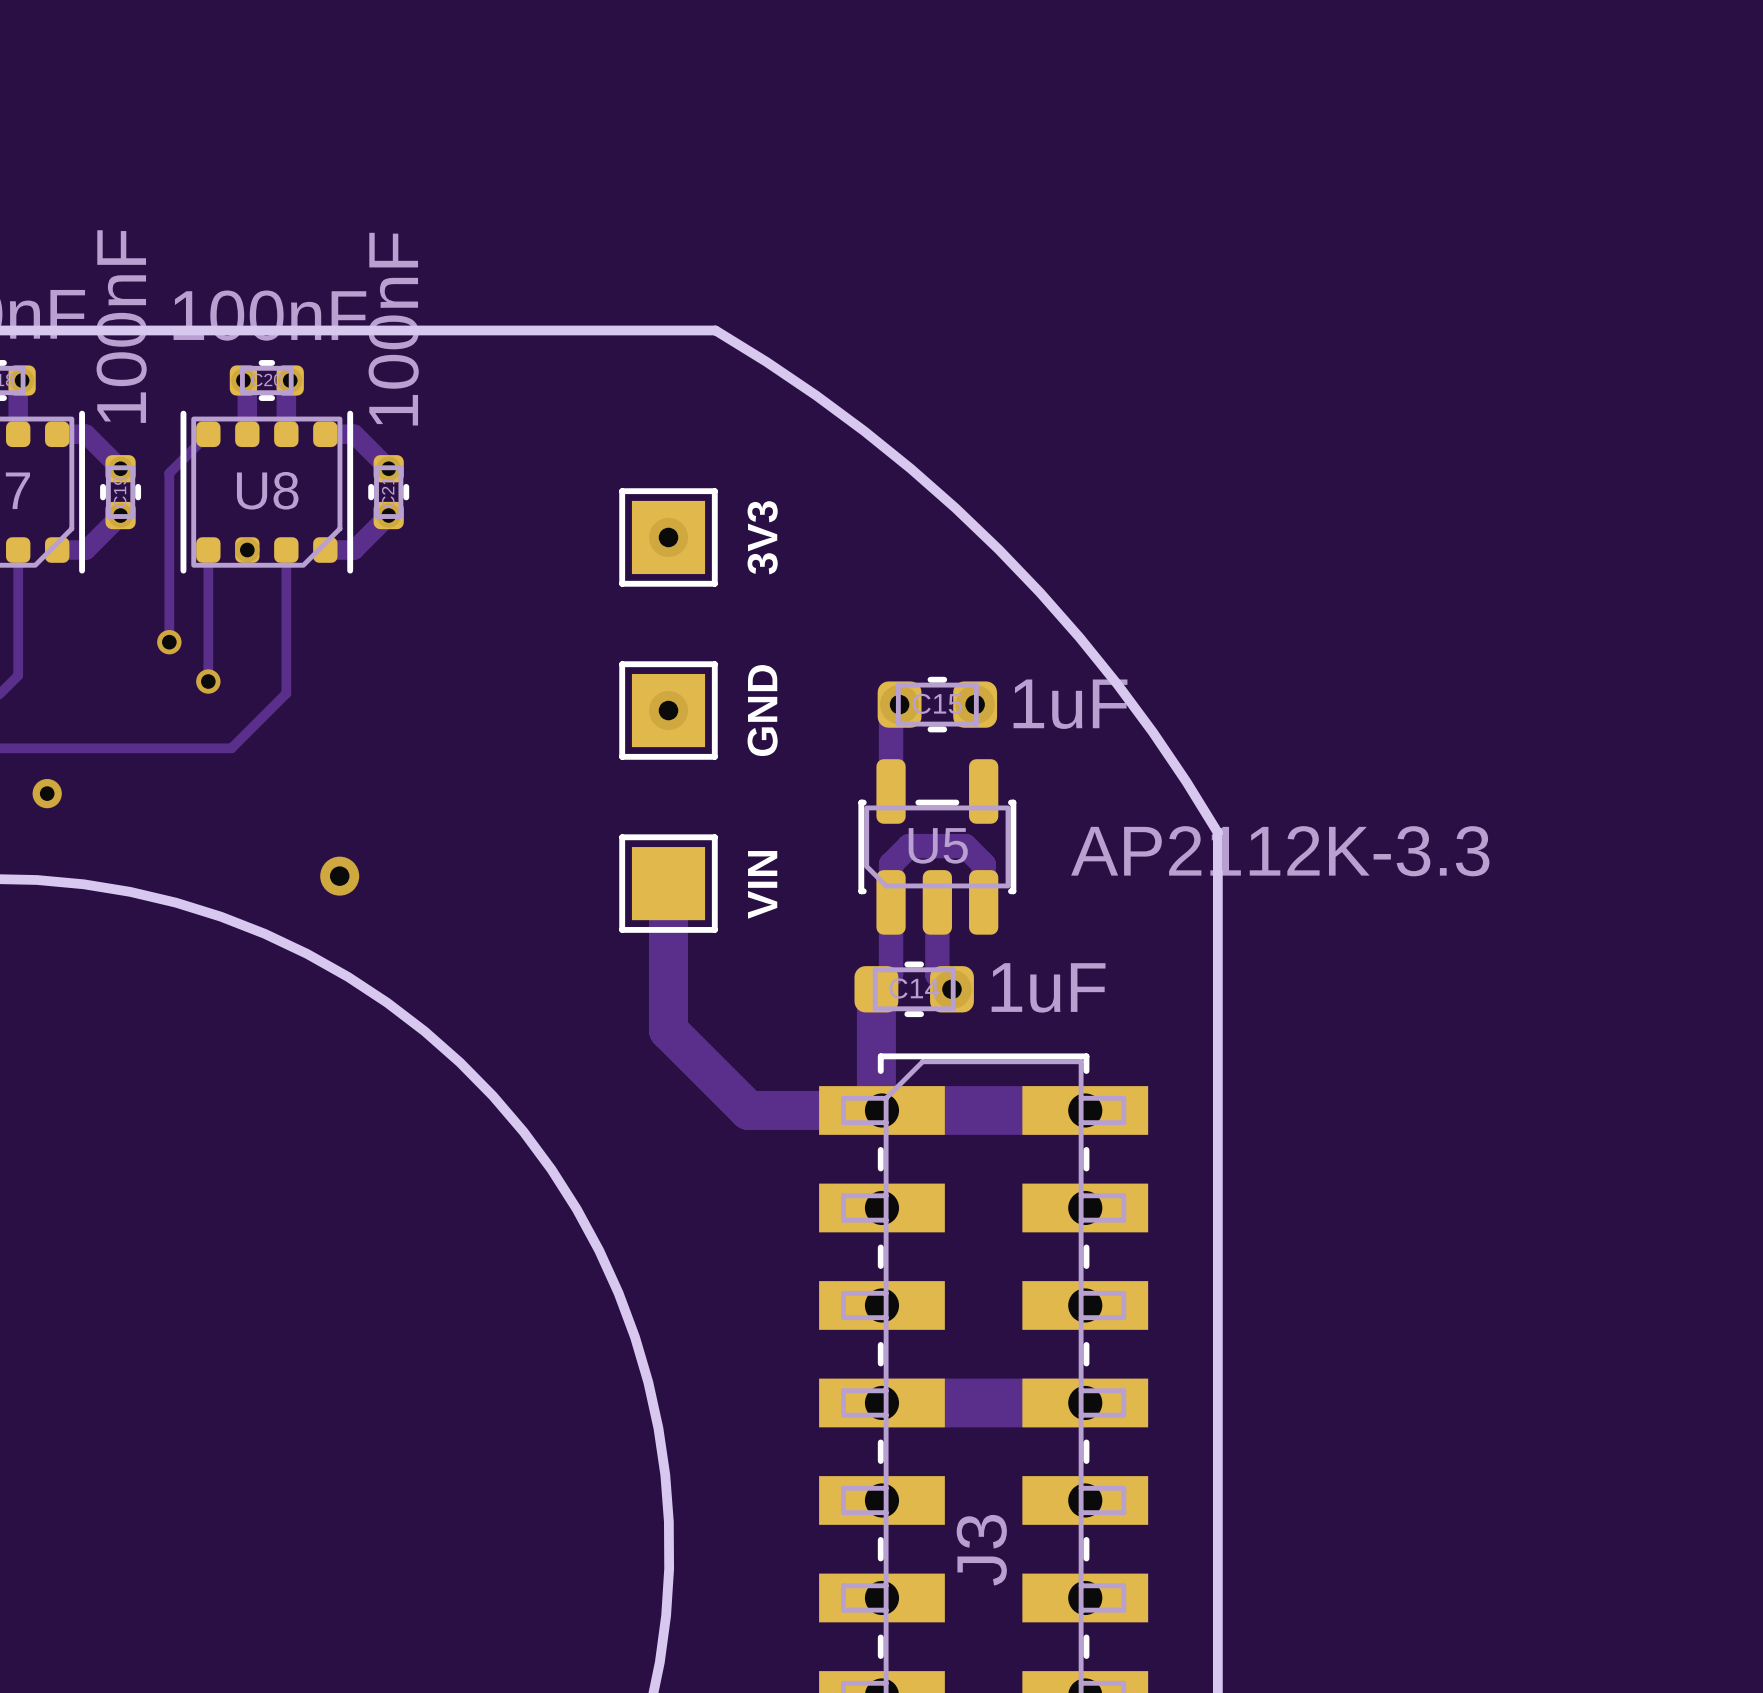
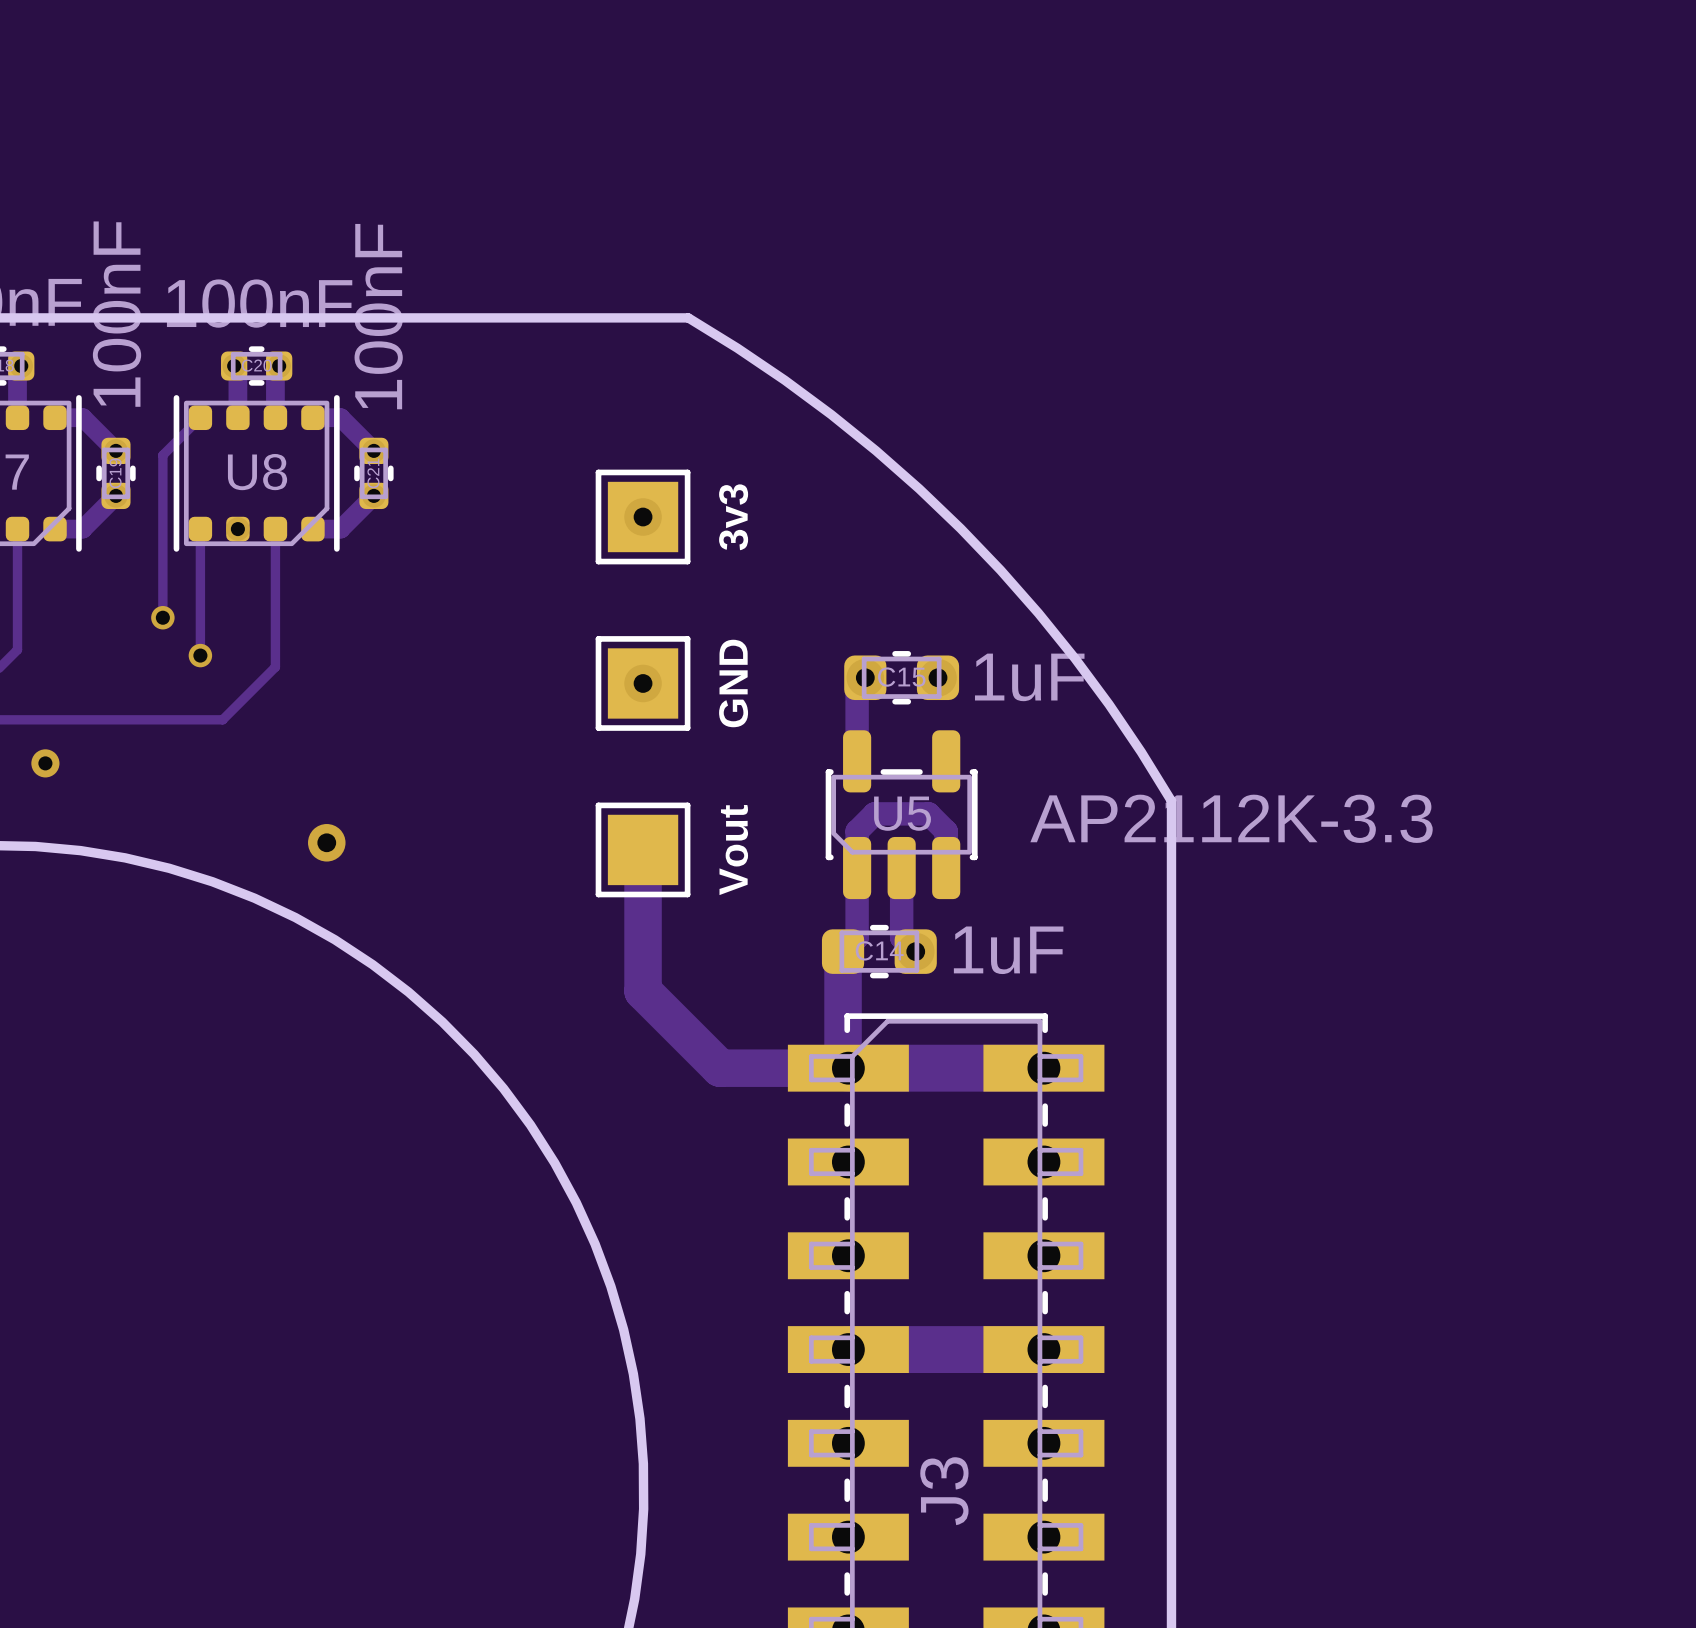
text: 3V3 (762, 537) -> 3v3 (733, 517)
text: VIN (762, 884) -> Vout (733, 850)

